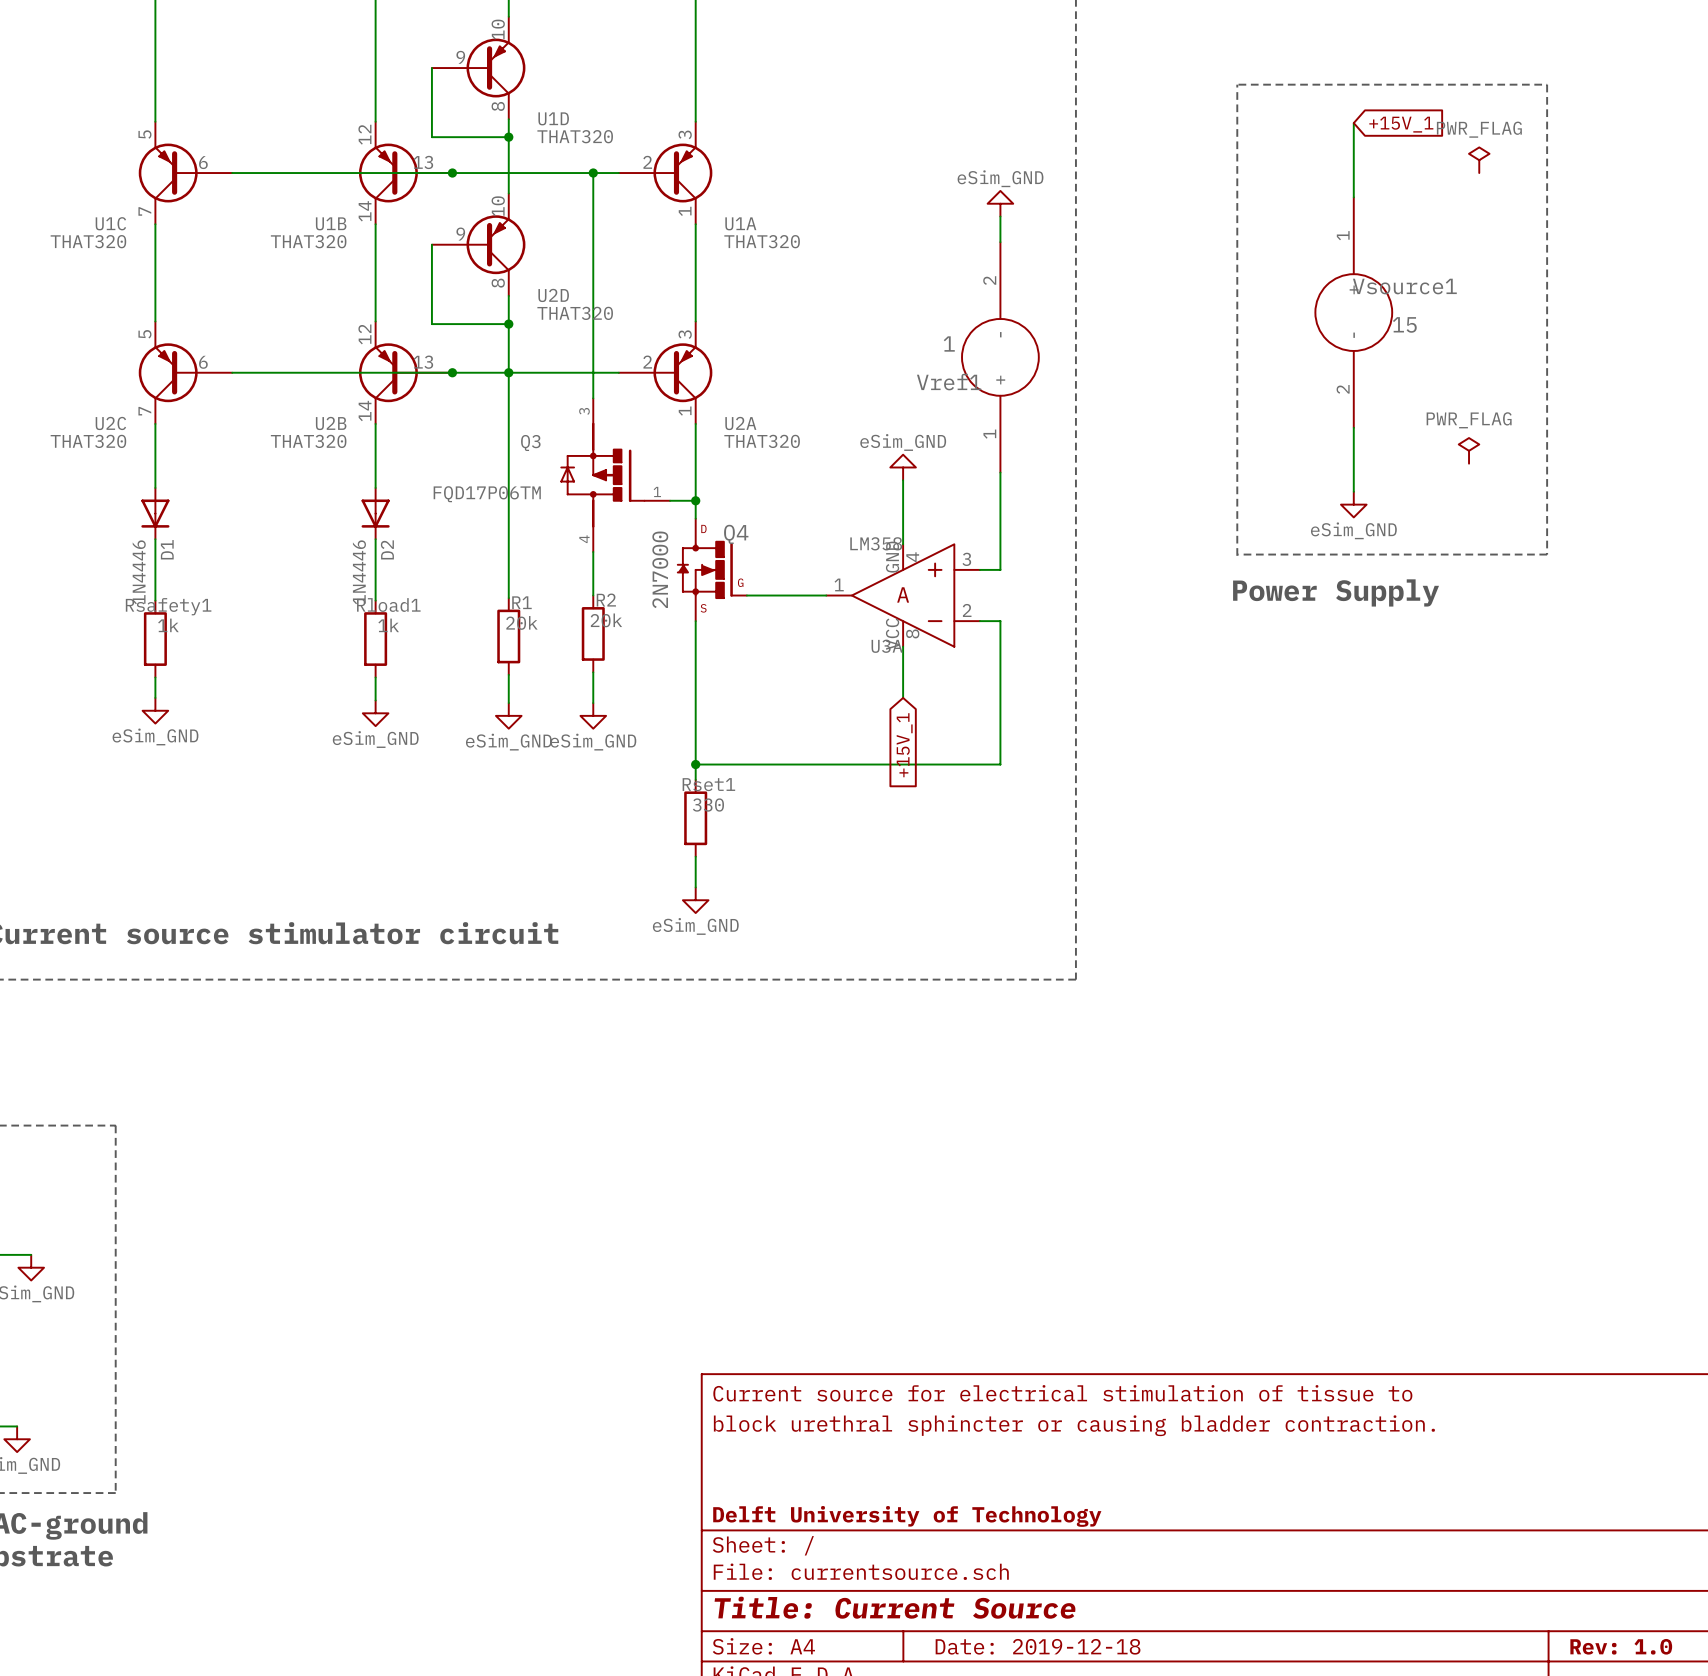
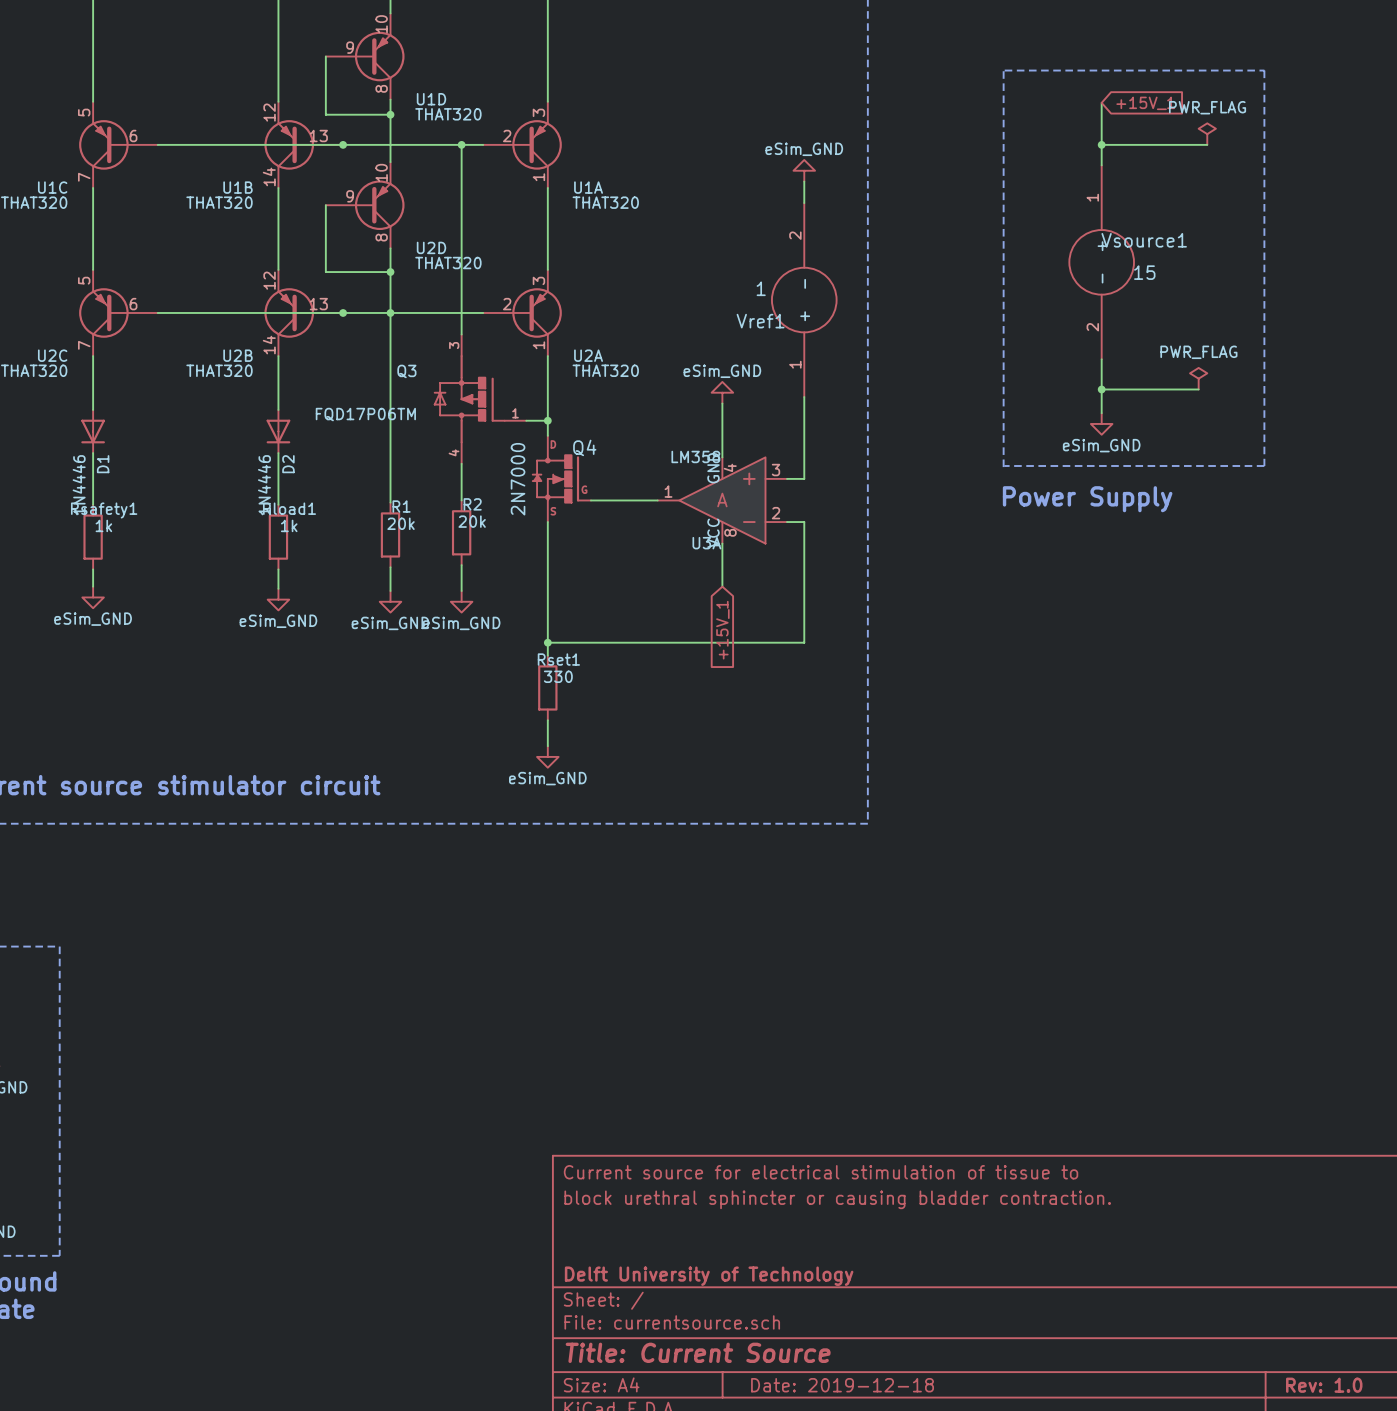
wire: none -> (1101, 144) (1207, 144)
junction: none -> (1101, 144)
wire: none -> (1101, 389) (1198, 389)
junction: none -> (1101, 389)

